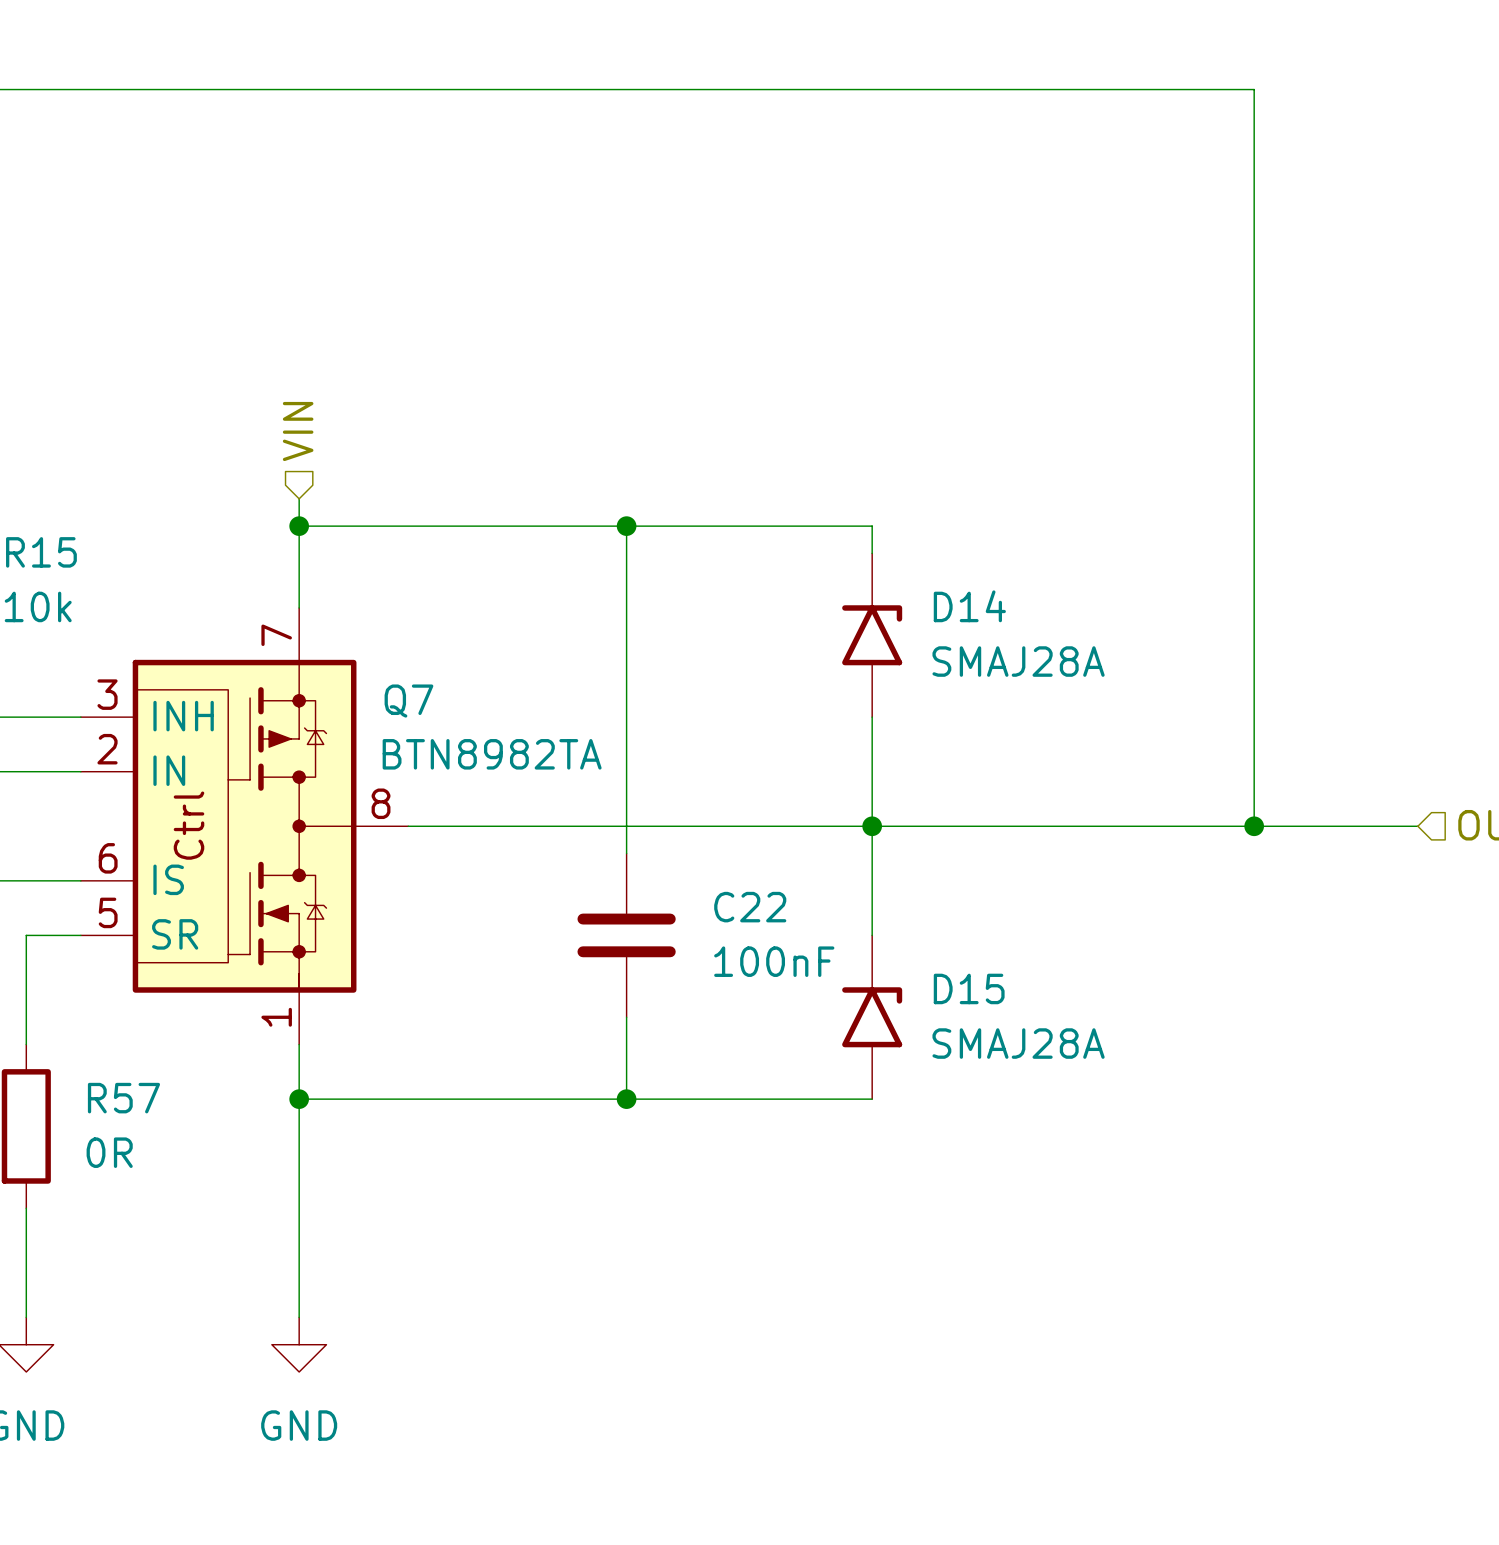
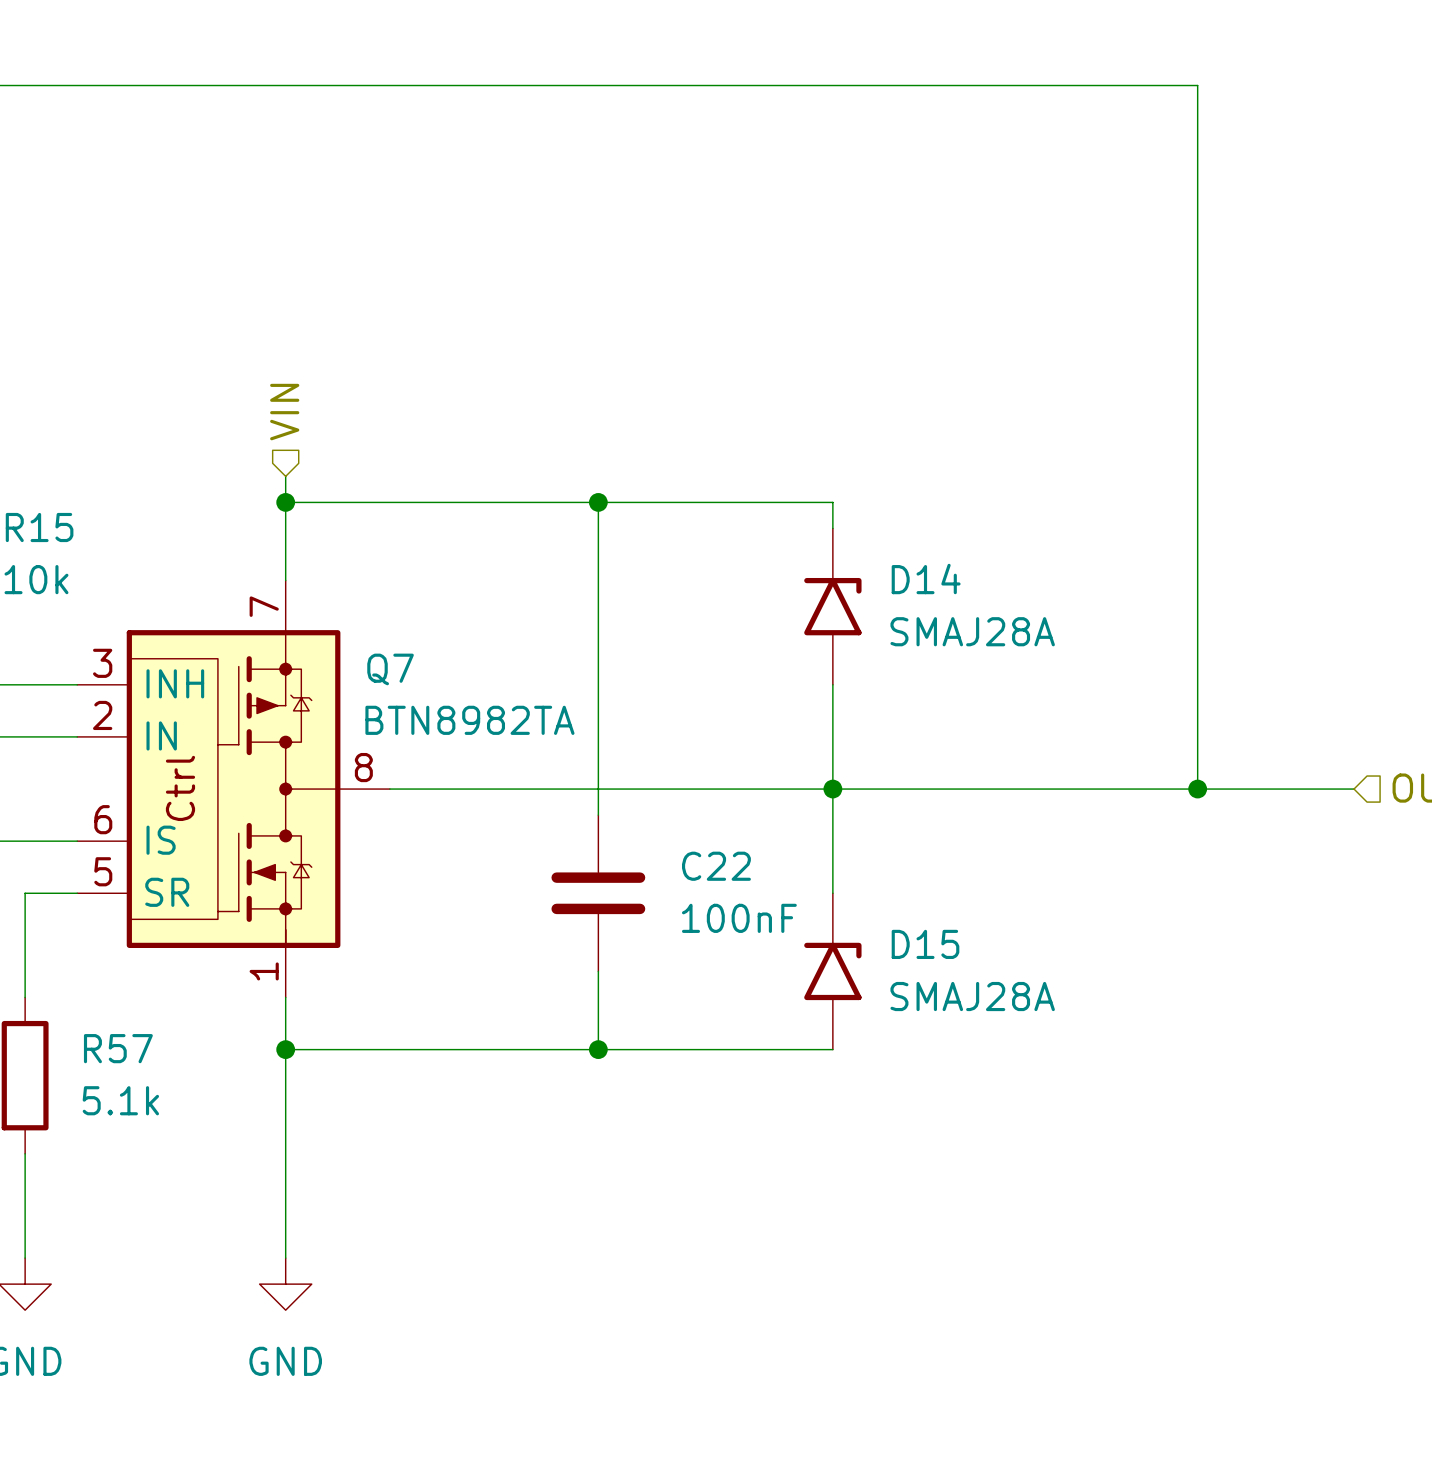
R57 value: 0R (109, 1152) -> 5.1k (120, 1100)

